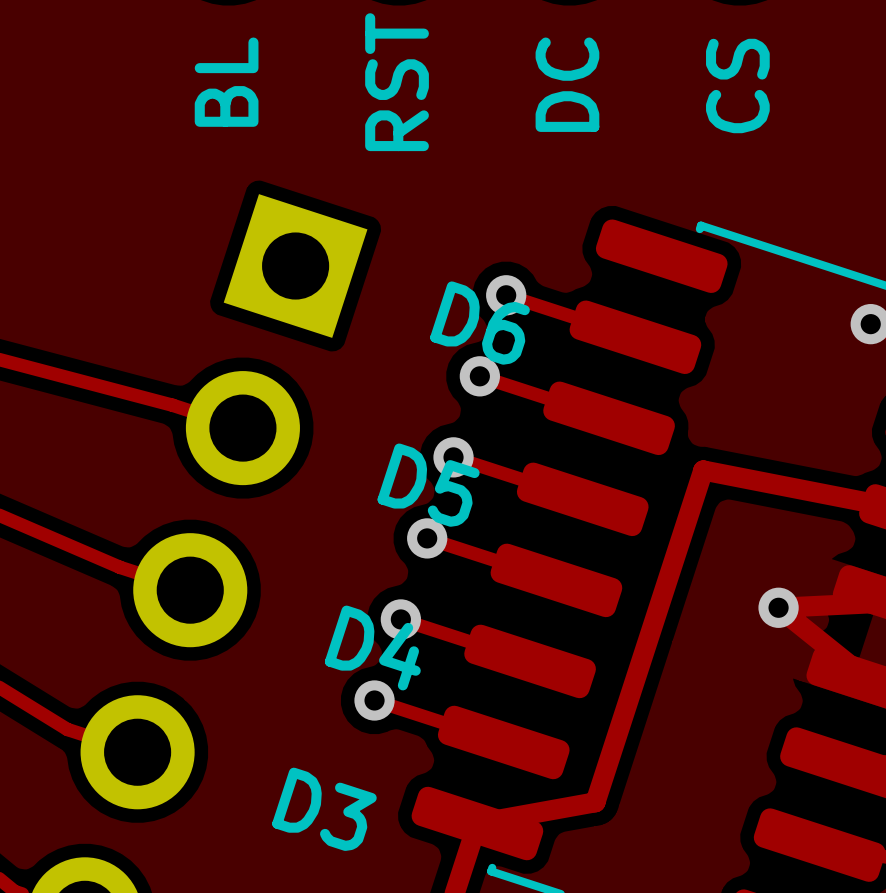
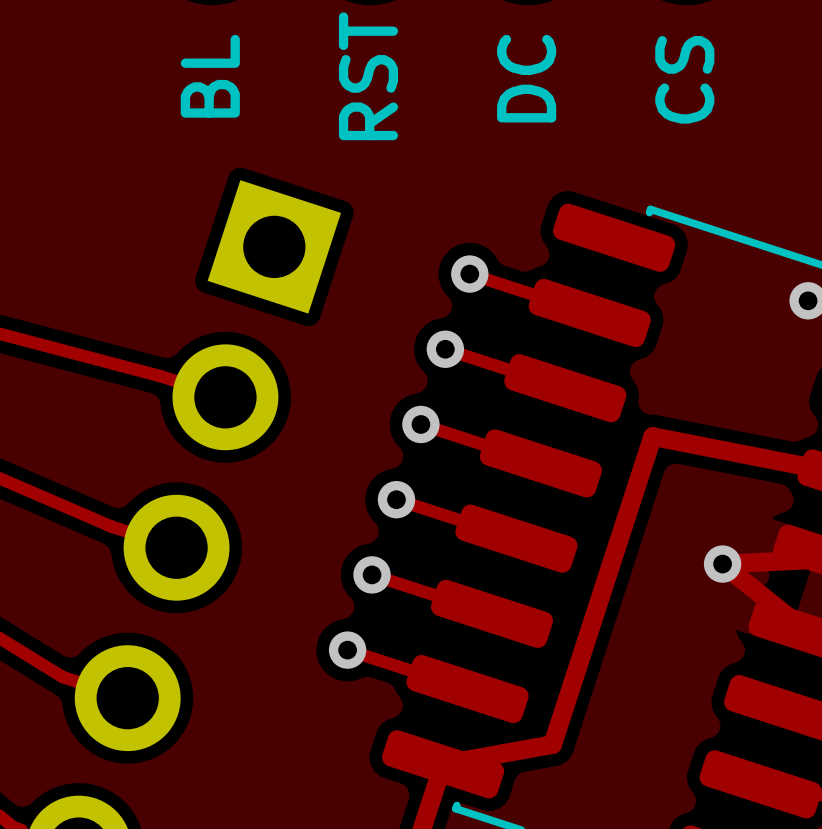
text: D6 (480, 323) -> none
text: D5 (428, 485) -> none
text: D4 (372, 648) -> none
text: D3 (324, 809) -> none

